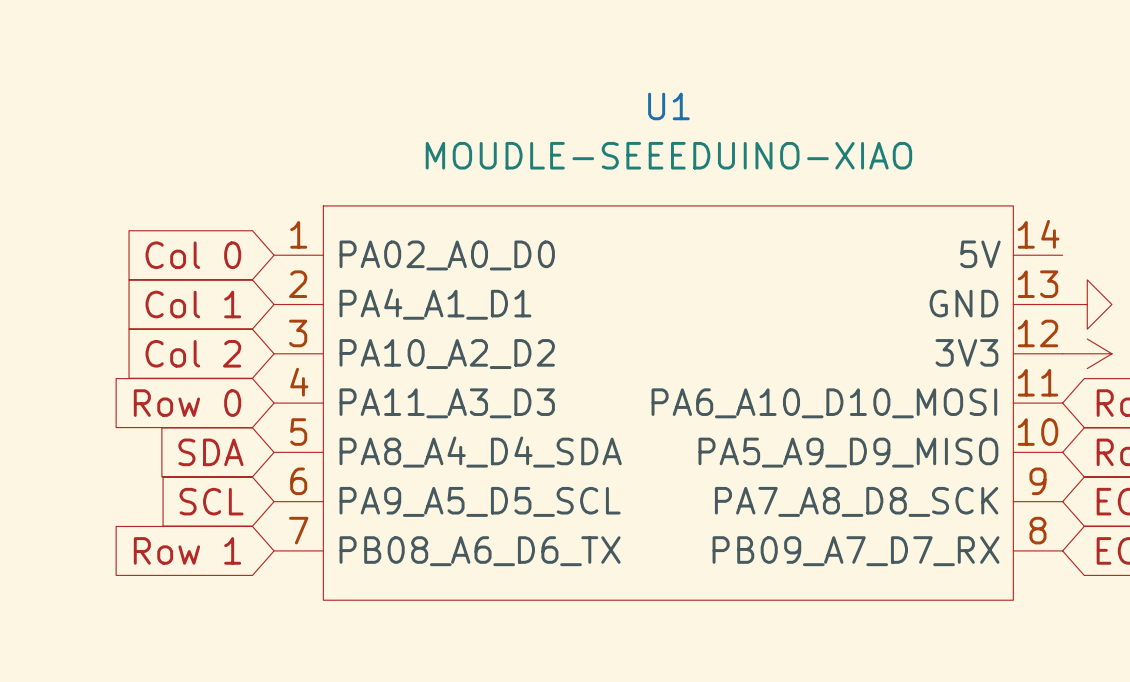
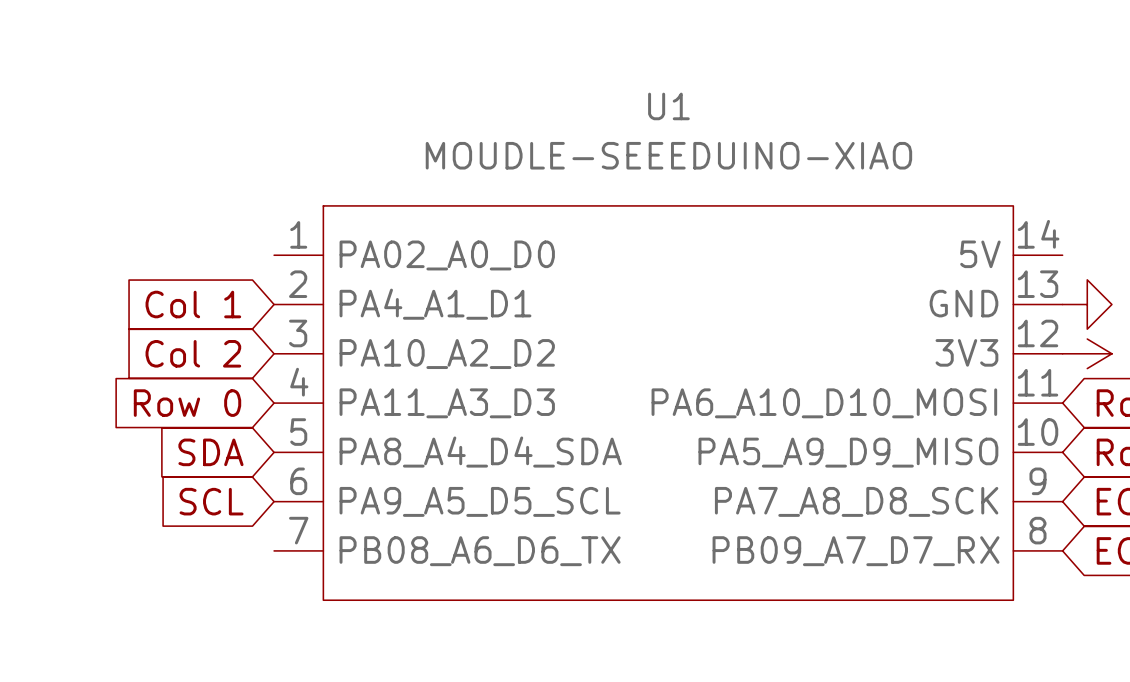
global label: Col 0 (193, 255) -> none
global label: Row 1 (187, 550) -> none

